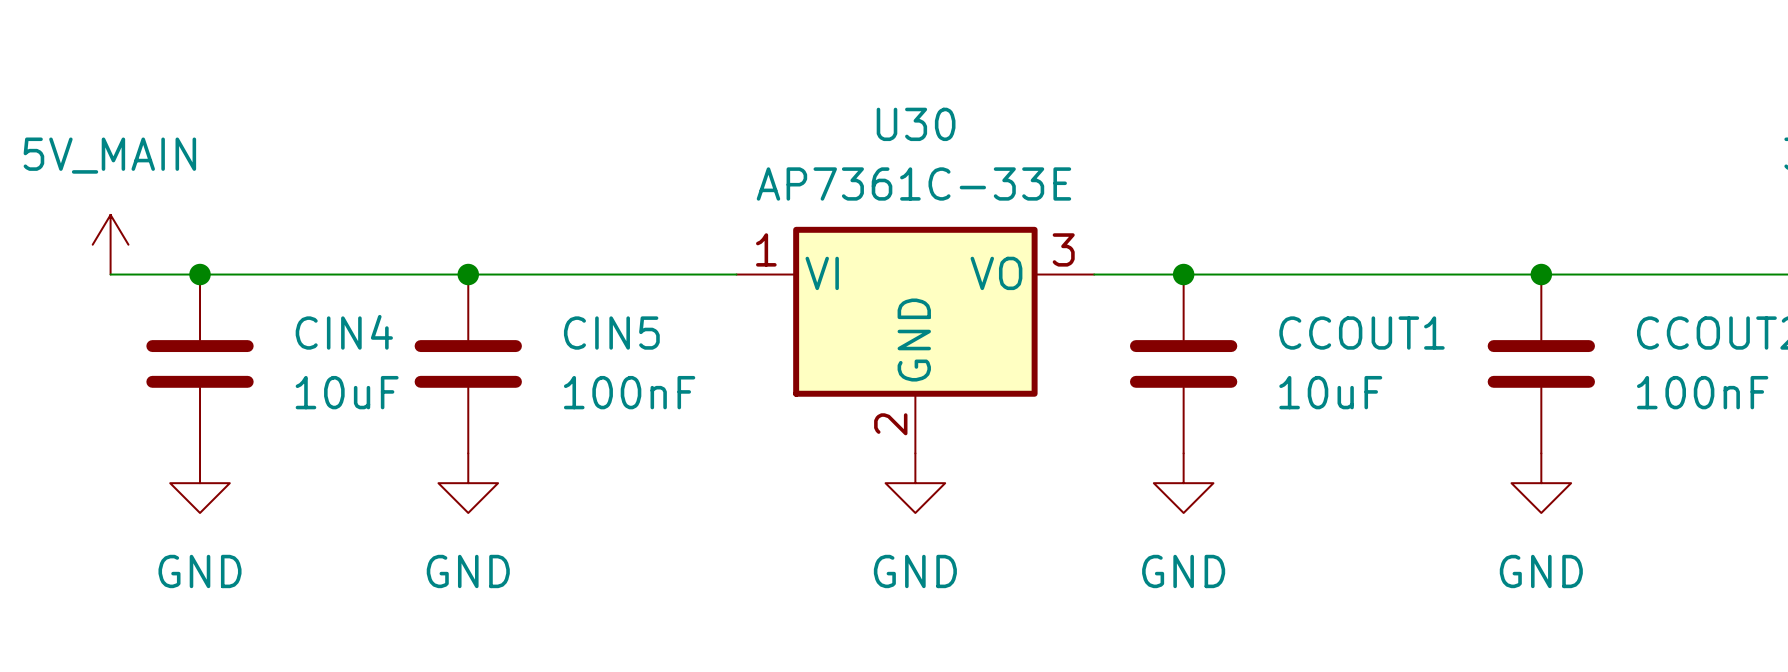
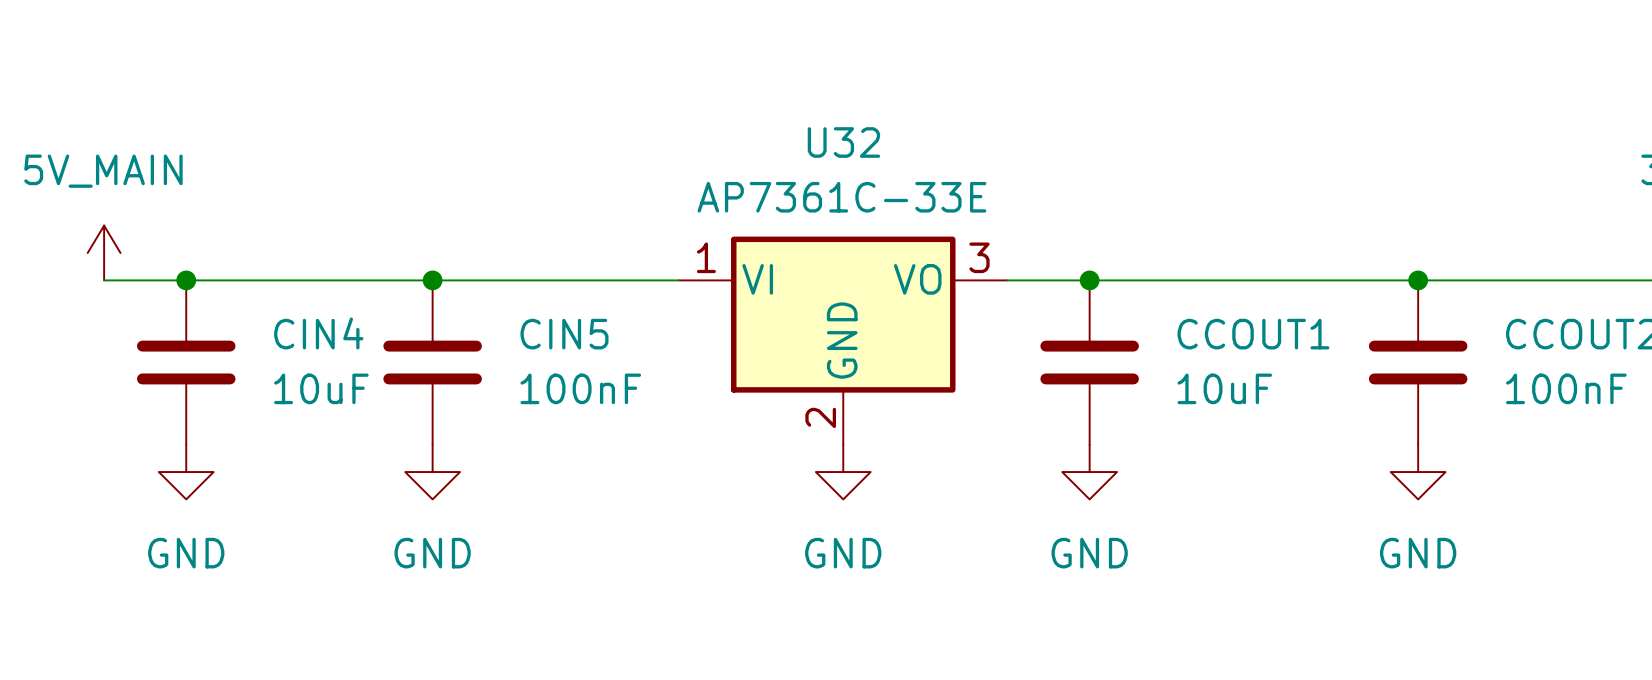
U30 name: U30 (916, 124) -> U32 (843, 142)

